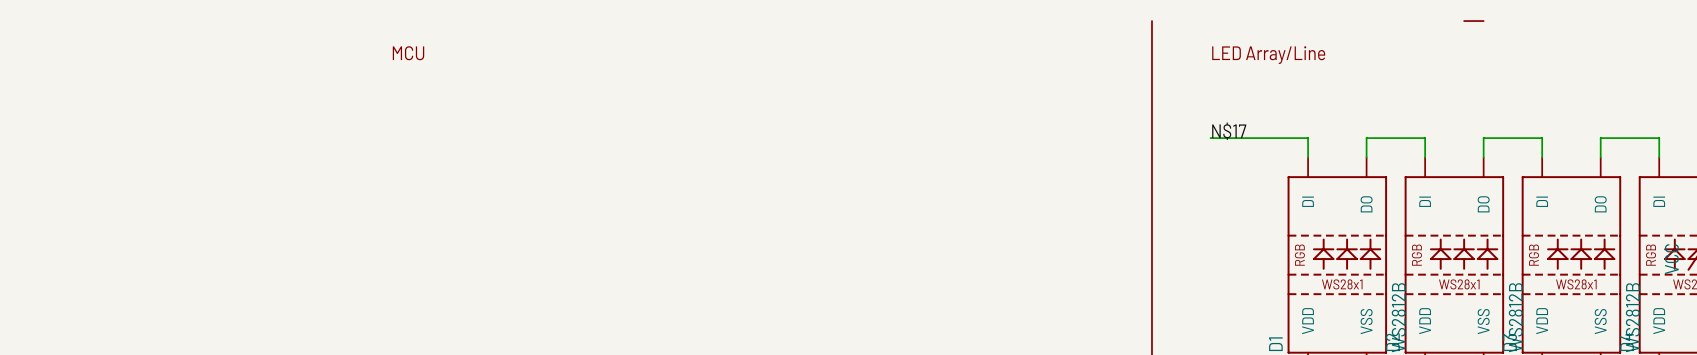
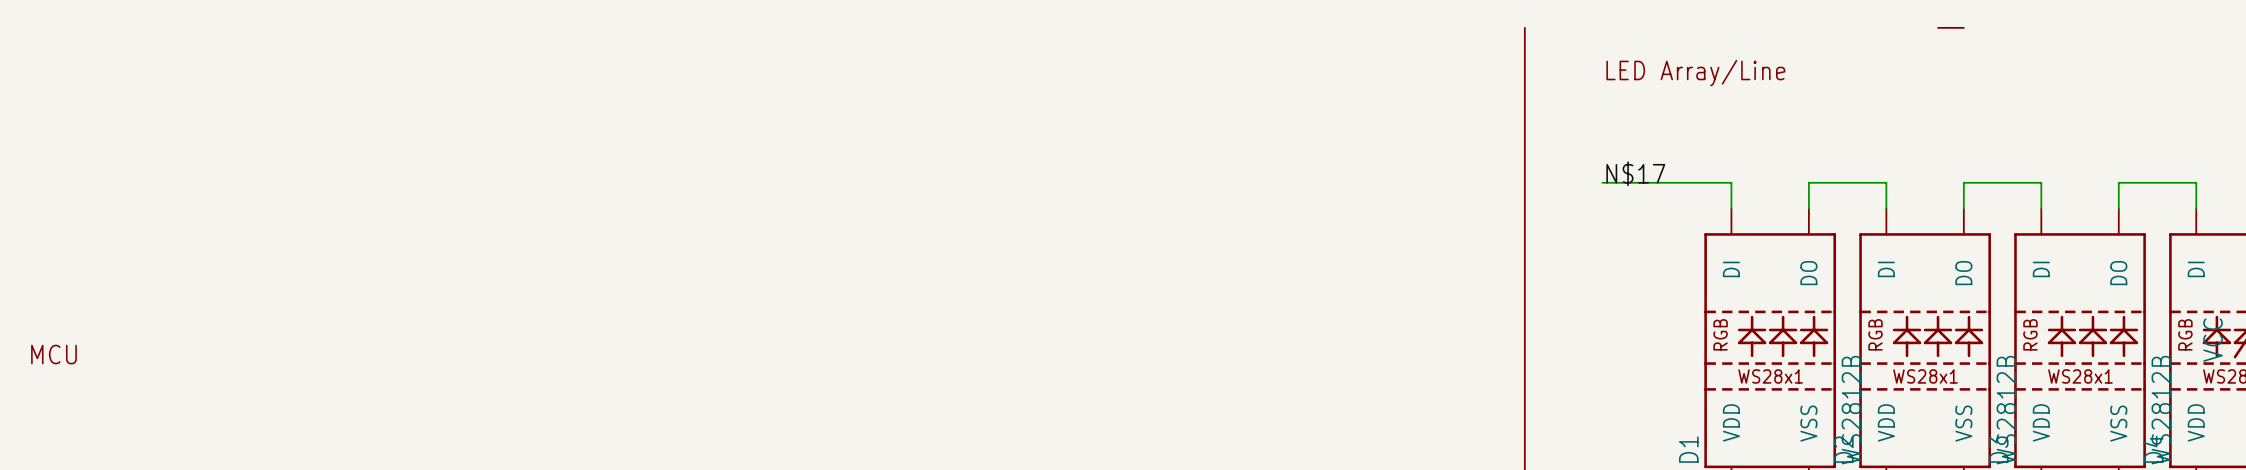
text: MCU (408, 53) -> none
text: none -> MCU (53, 354)

